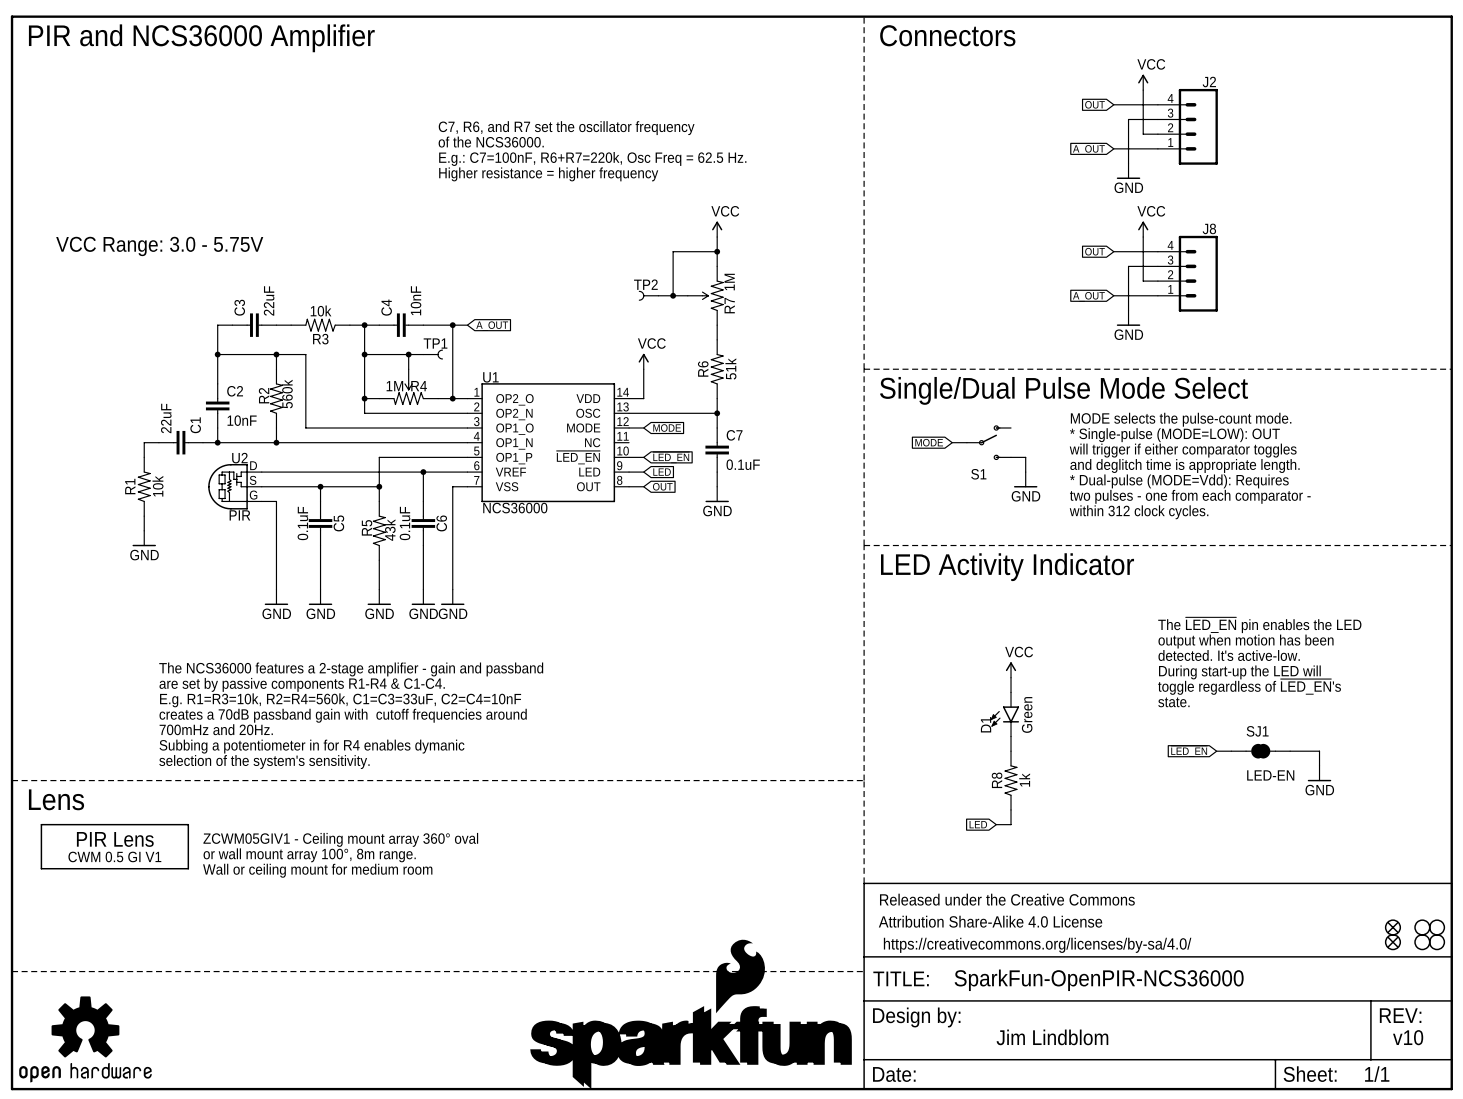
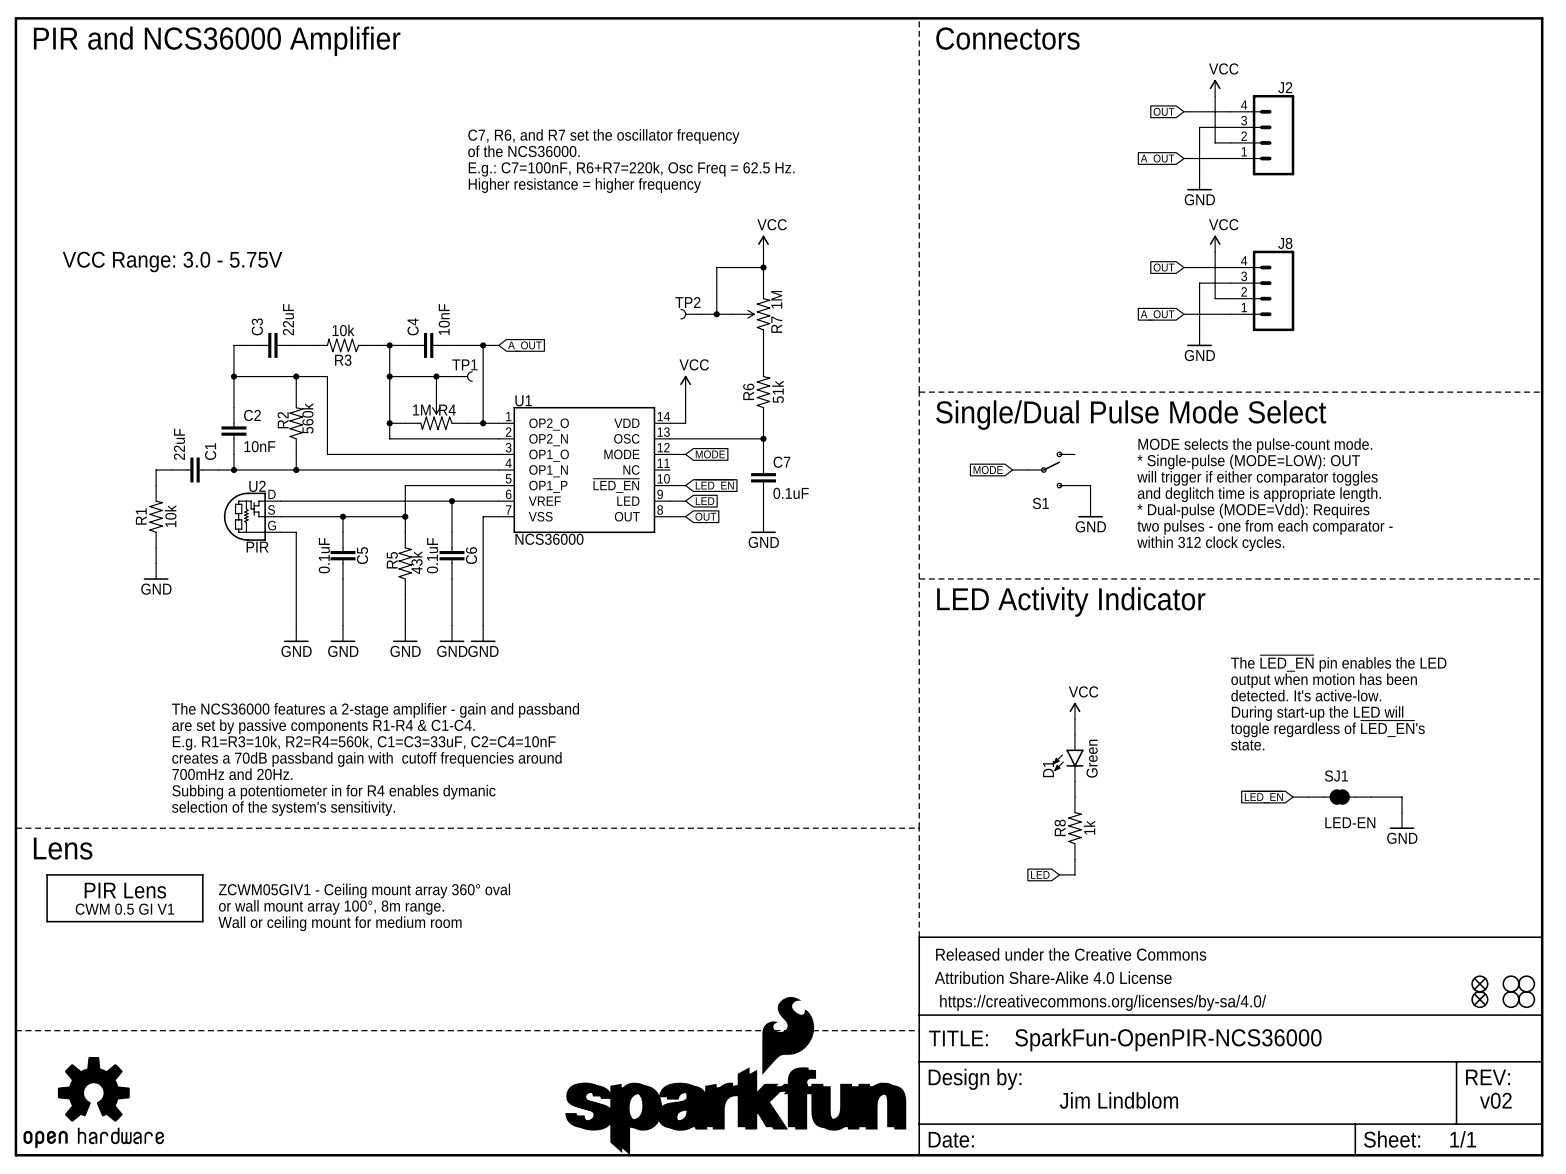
text: v10 (1408, 1037) -> v02 (1495, 1100)

